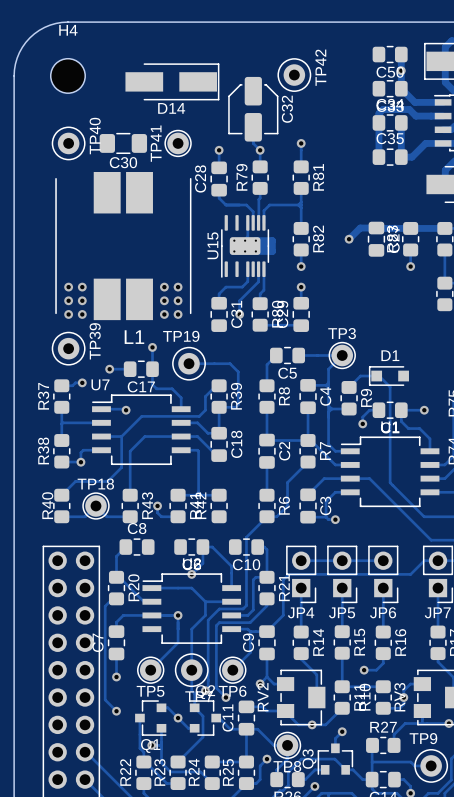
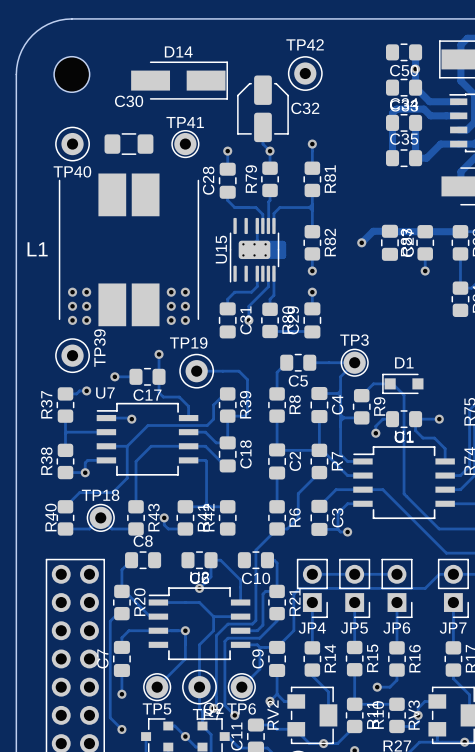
H4 name: H4 (68, 30) -> none
TP42 name rotation: 0° (320, 67) -> 90° clockwise (305, 44)
D14 name position: D14 (171, 108) -> D14 (178, 51)
C32 name rotation: 0° (287, 109) -> 90° clockwise (305, 108)
TP40 name rotation: 0° (95, 136) -> 90° clockwise (72, 171)
TP41 name rotation: 0° (156, 143) -> 90° clockwise (185, 122)
C30 name position: C30 (123, 162) -> C30 (129, 101)
L1 name position: L1 (134, 337) -> L1 (37, 249)

